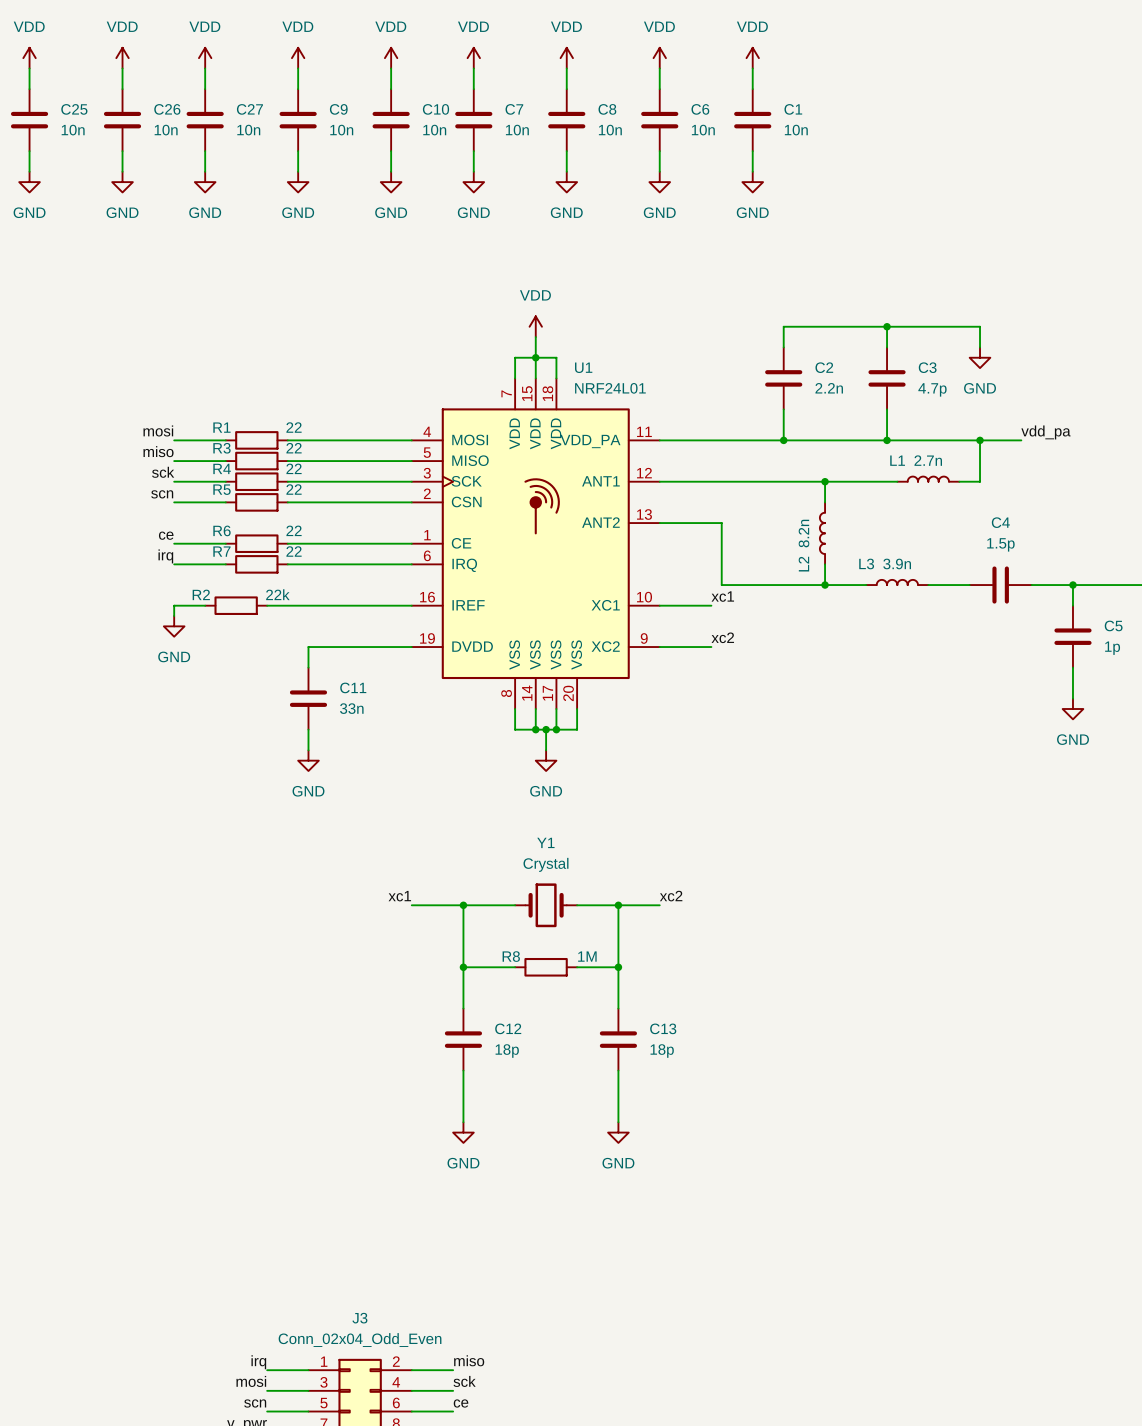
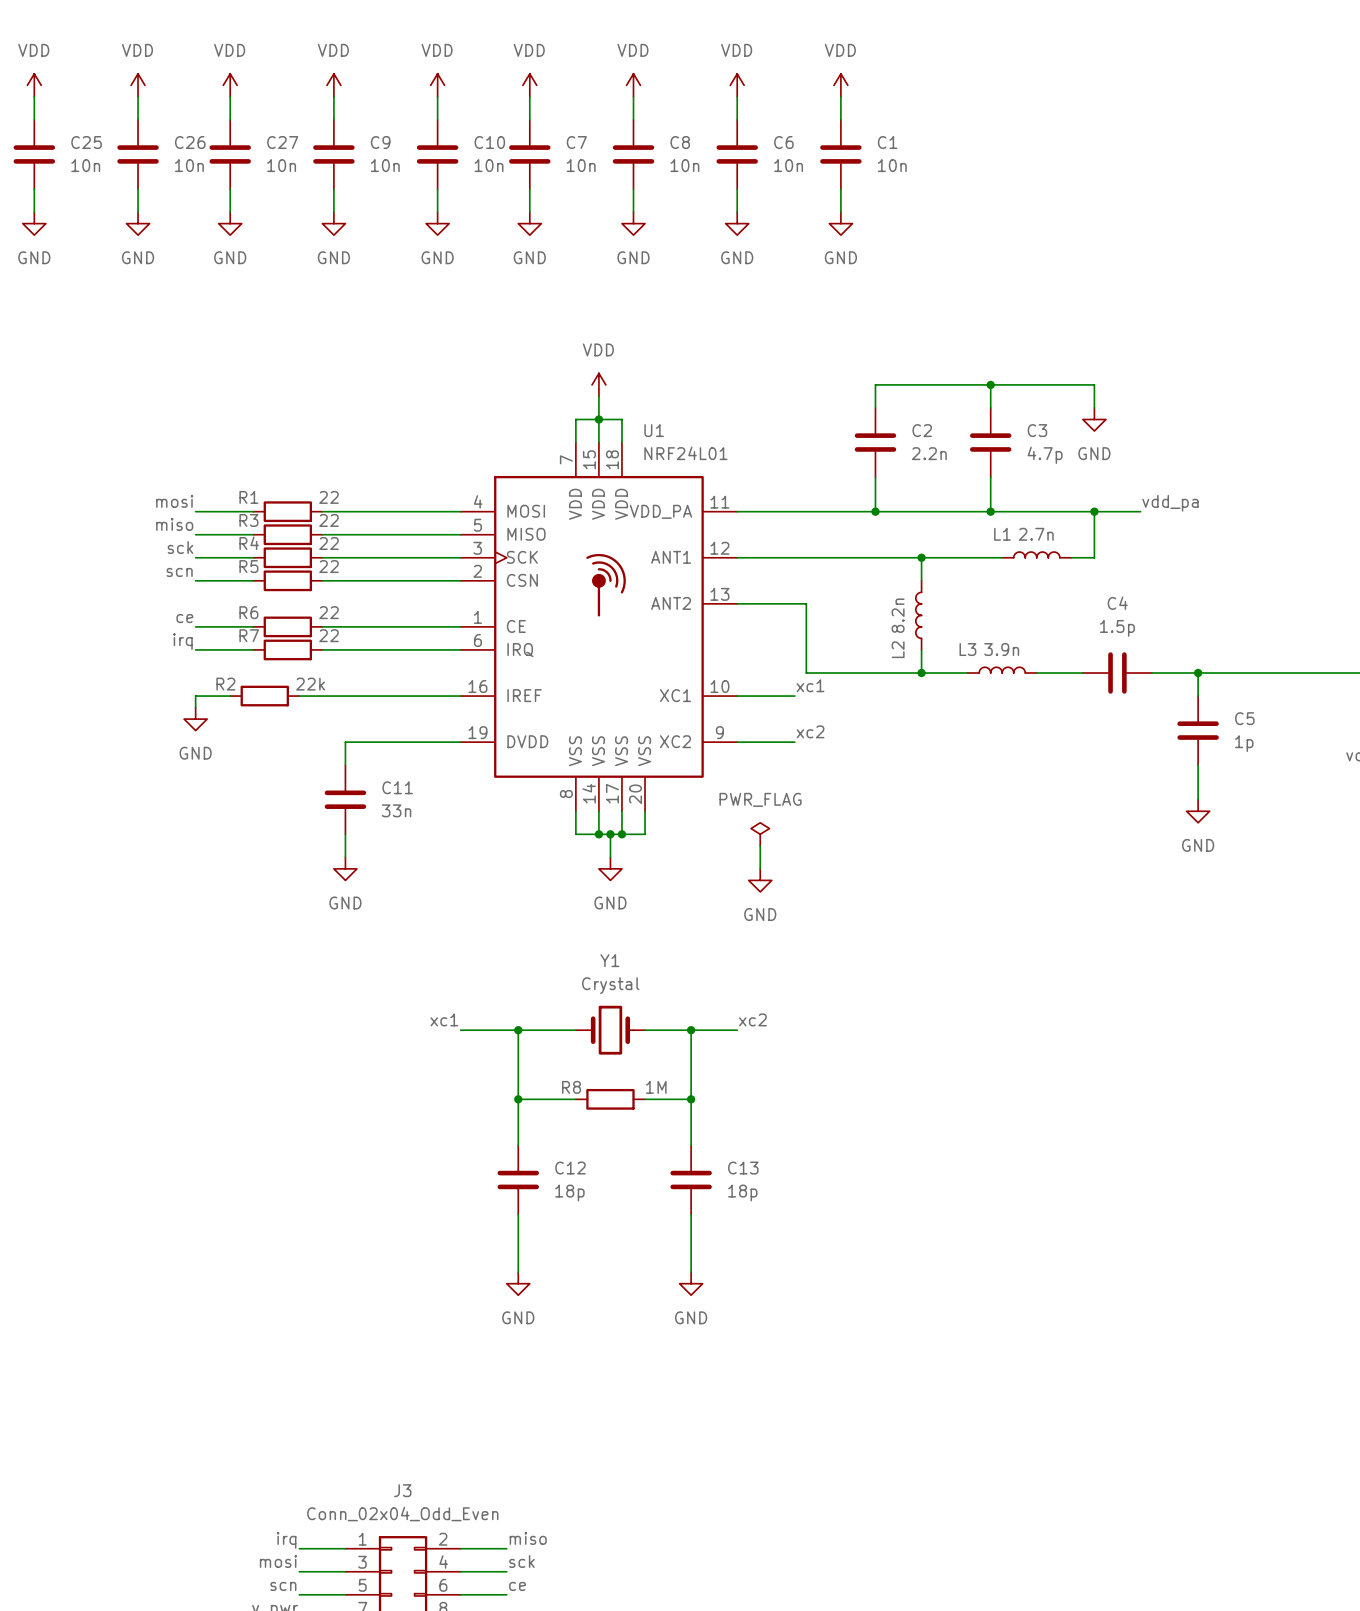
power symbol: none -> PWR_FLAG (760, 834)
wire: none -> (760, 845) (760, 868)
power symbol: none -> GND (760, 880)

